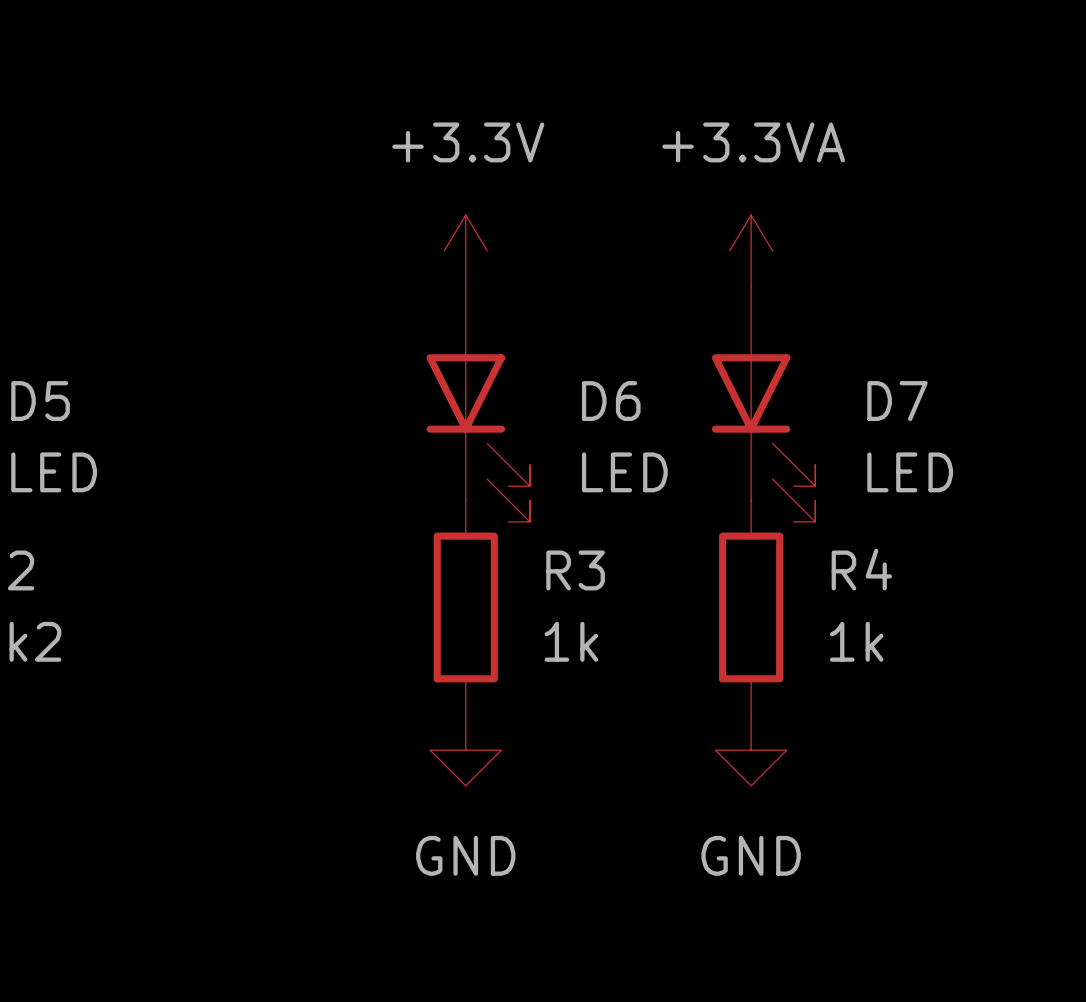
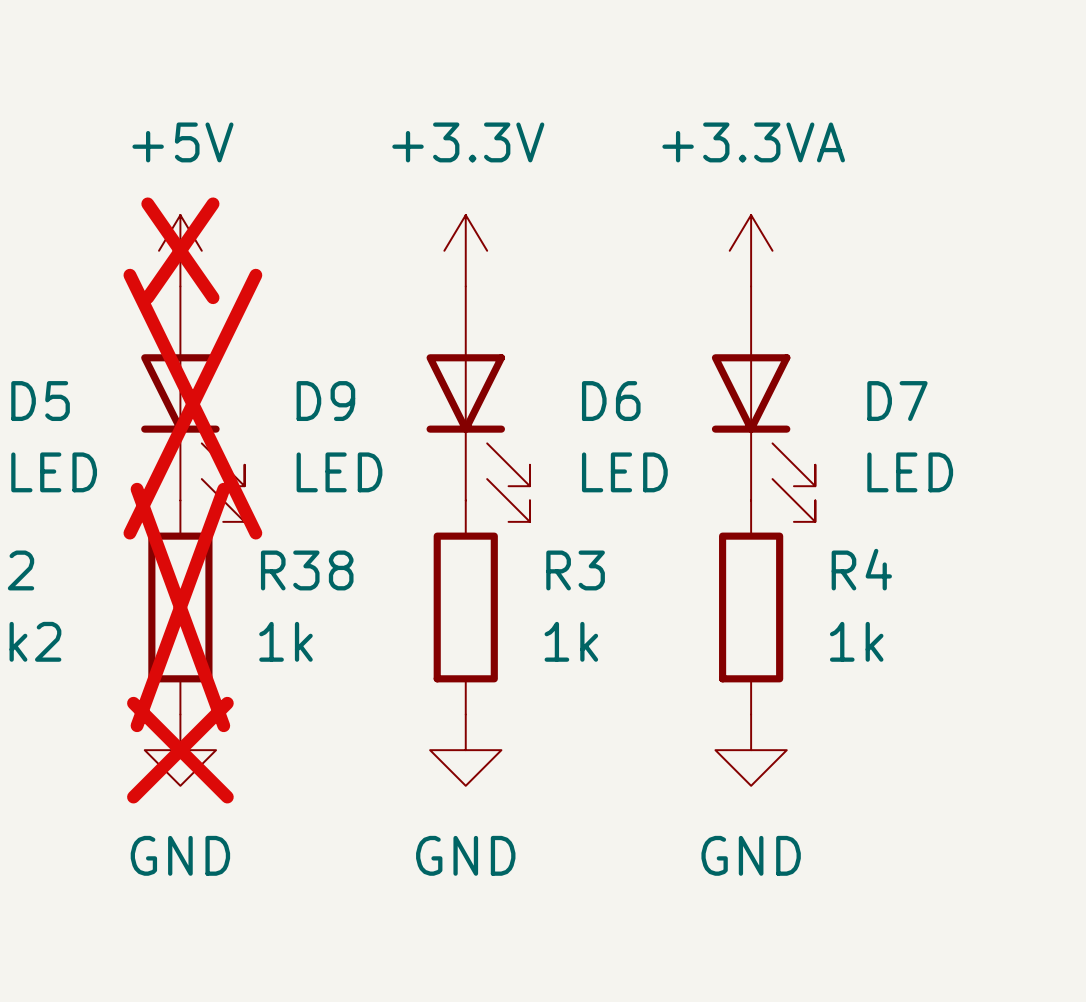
power symbol: none -> +5V (180, 250)
D9: none -> LED (192, 404)
R38: none -> 1k (180, 607)
power symbol: none -> GND (180, 750)

